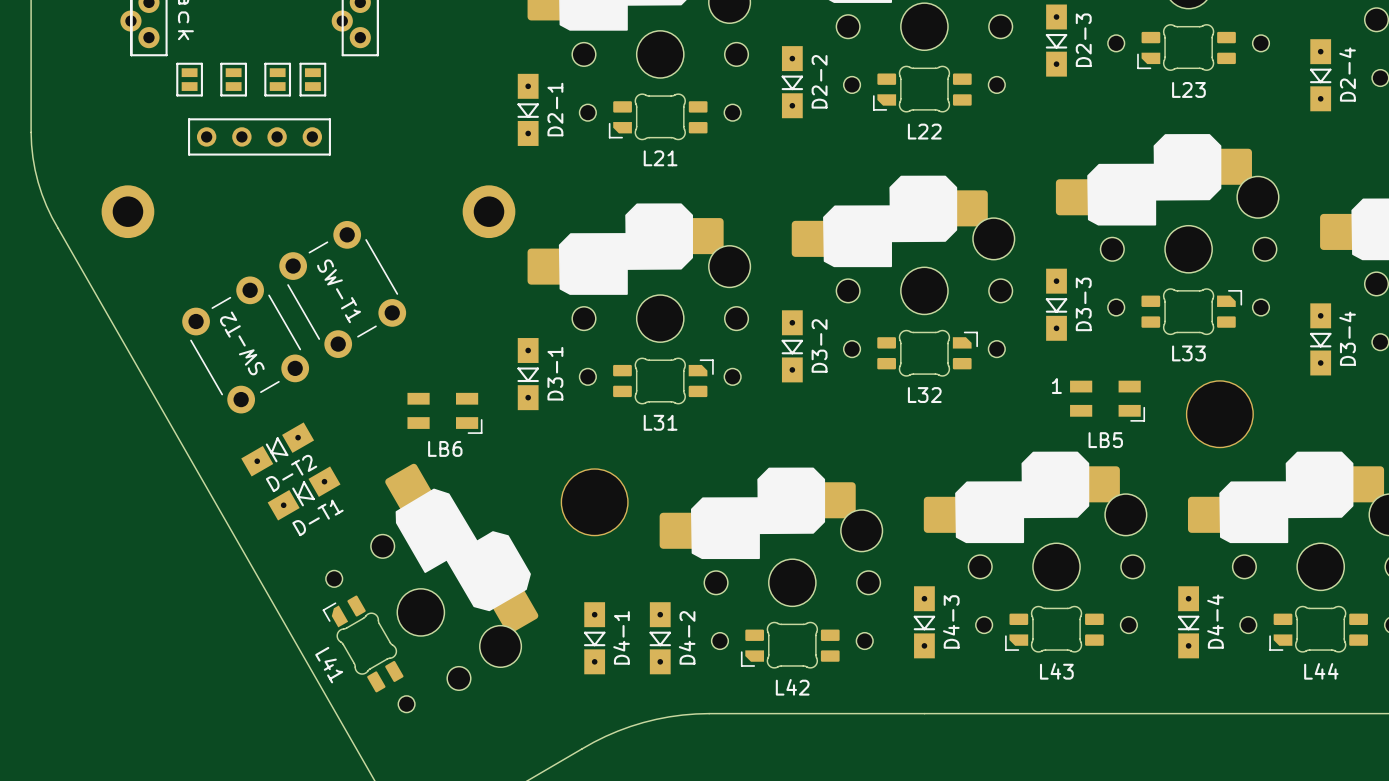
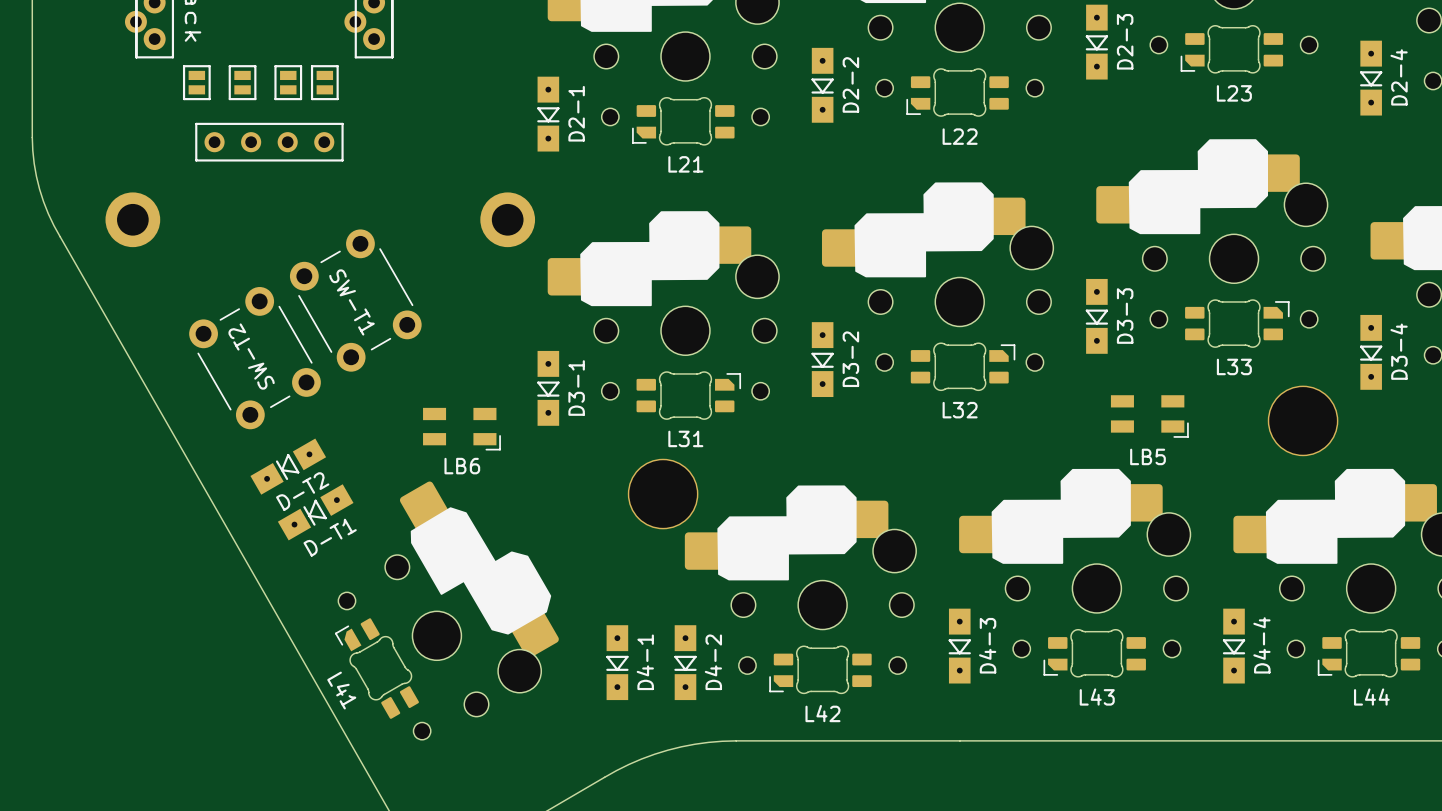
LB5 text: 1 (1056, 386) -> none
part position: (1219, 414) -> (1303, 420)
part position: (594, 502) -> (663, 494)

